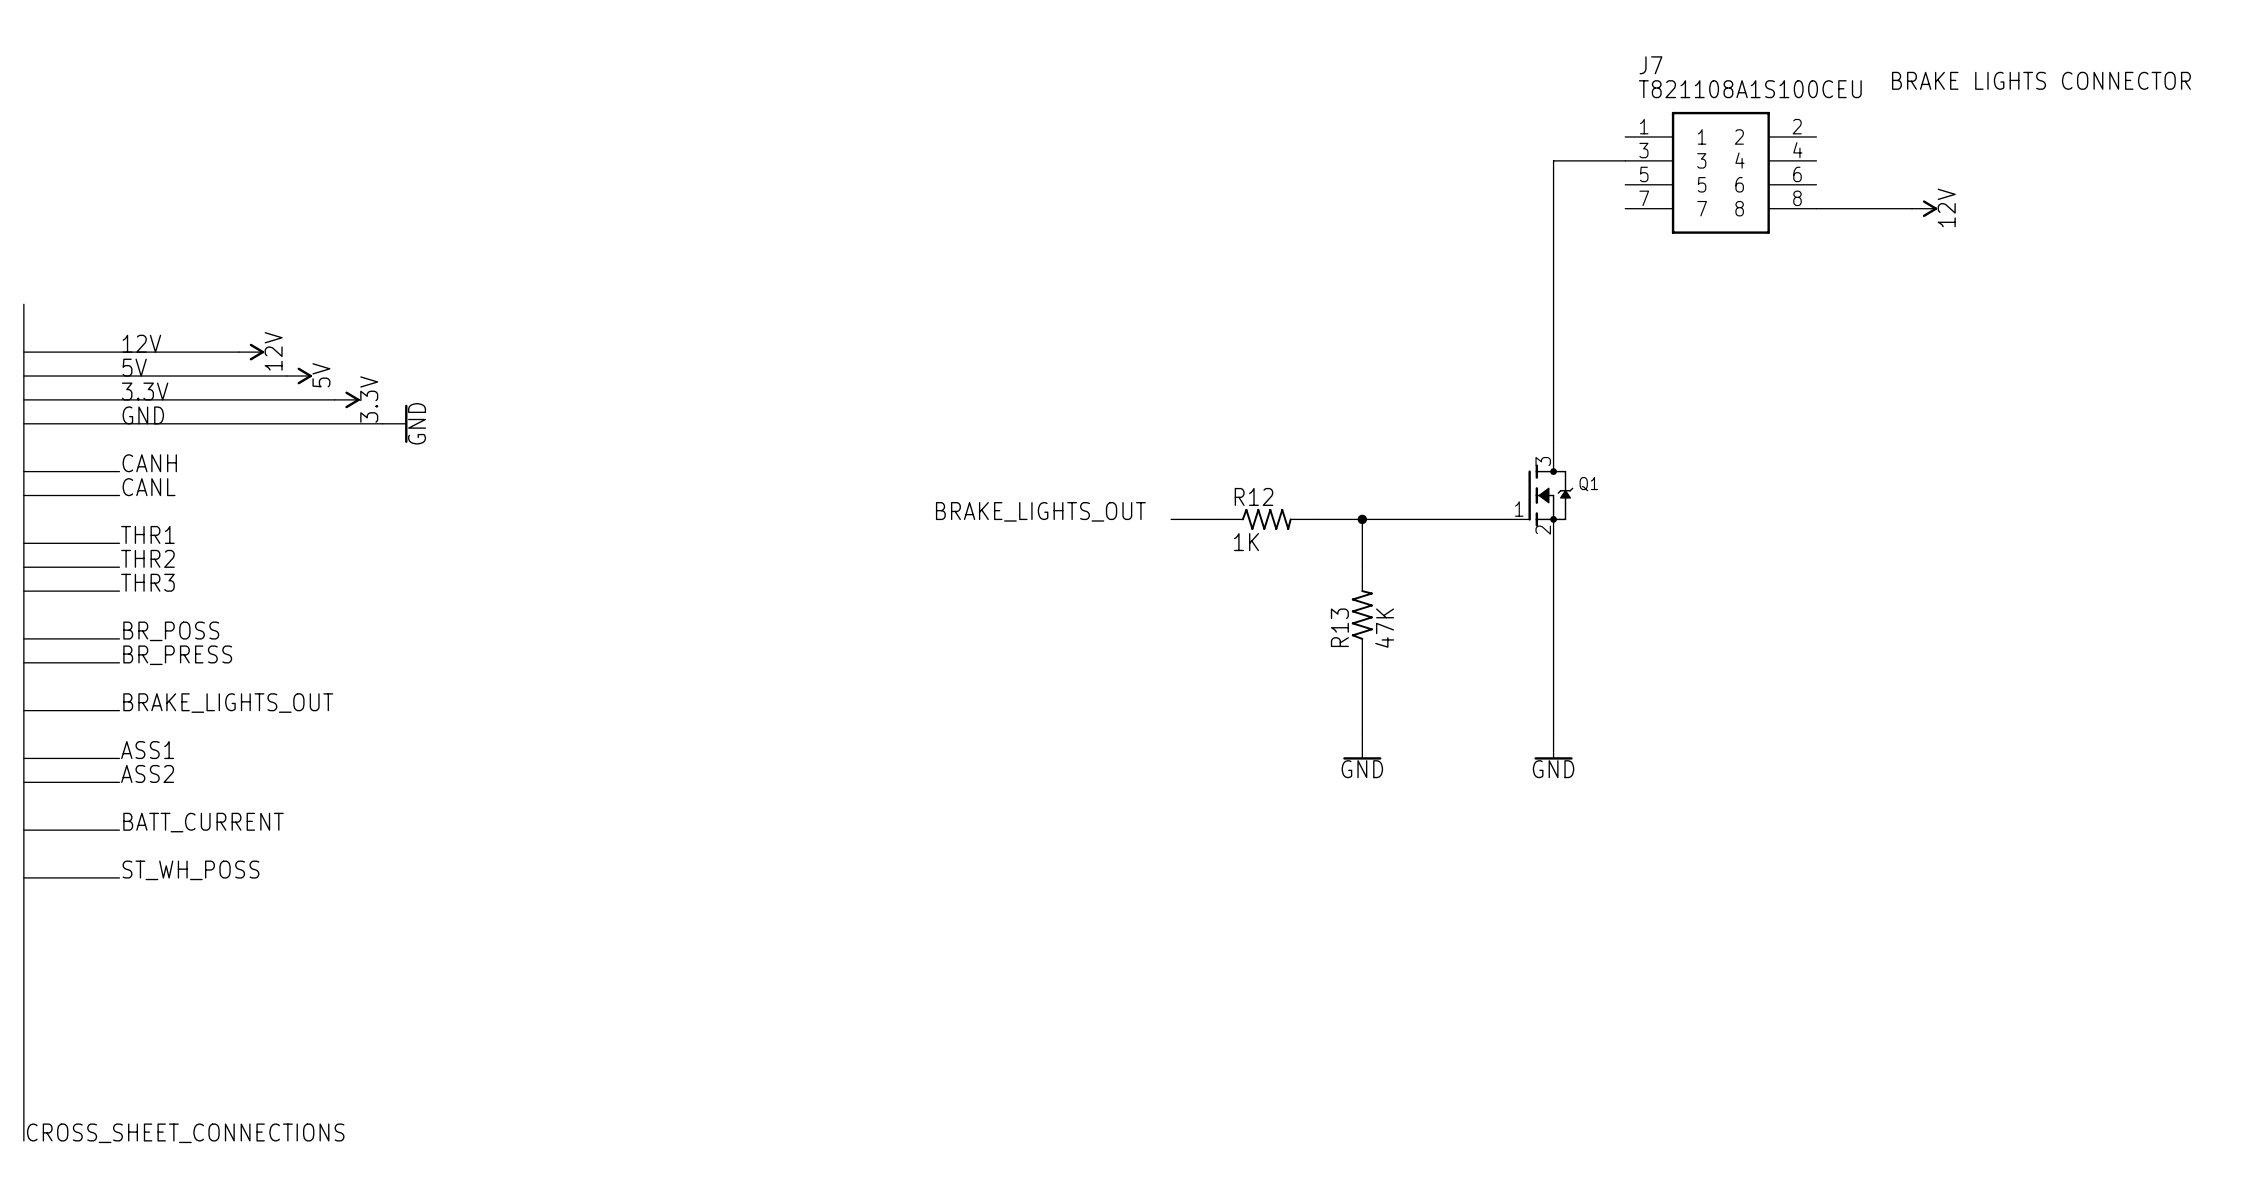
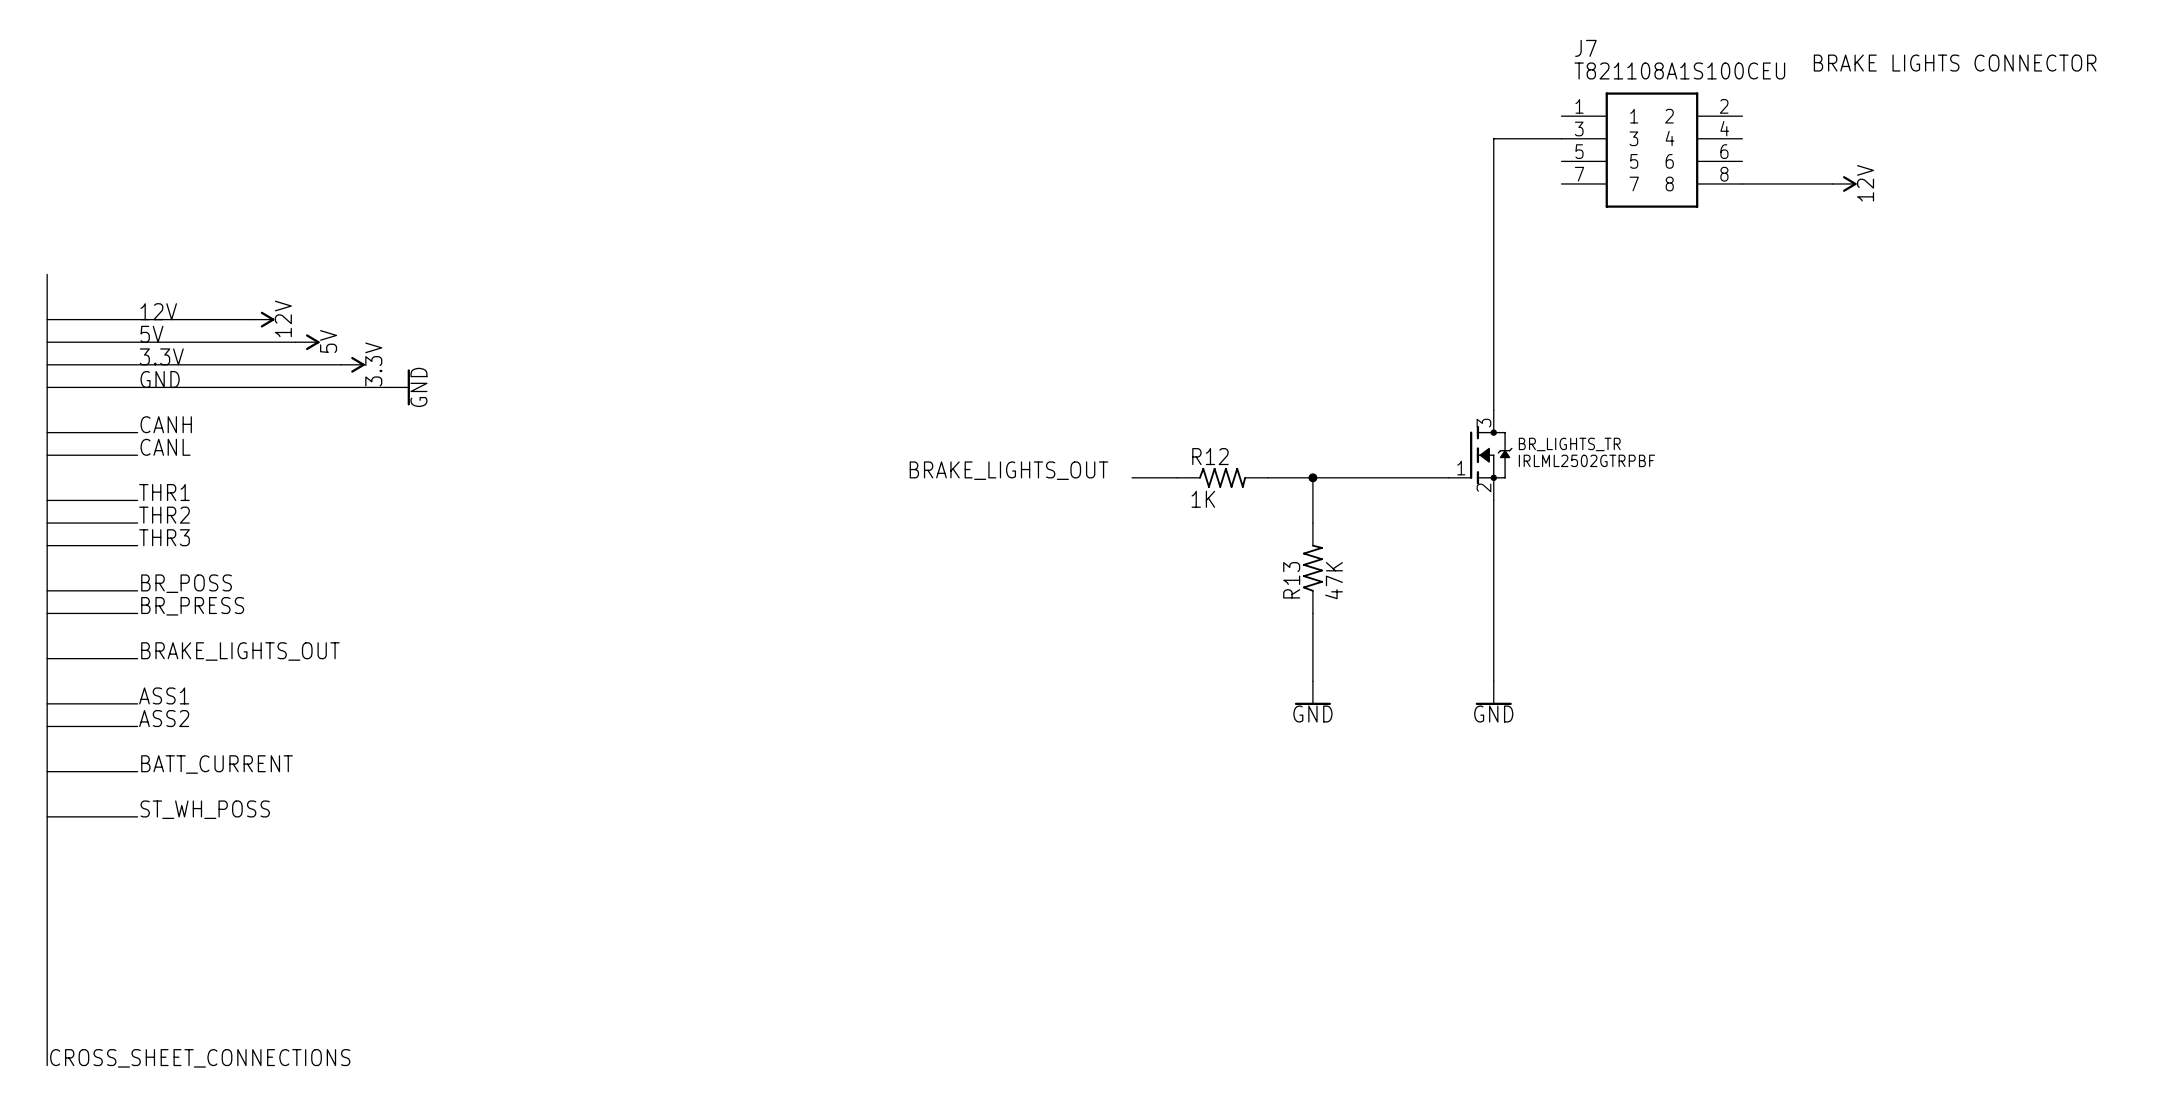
Q1 name: Q1 (1588, 484) -> BR_LIGHTS_TR (1569, 444)
Q1 value: none -> IRLML2502GTRPBF (1586, 460)

